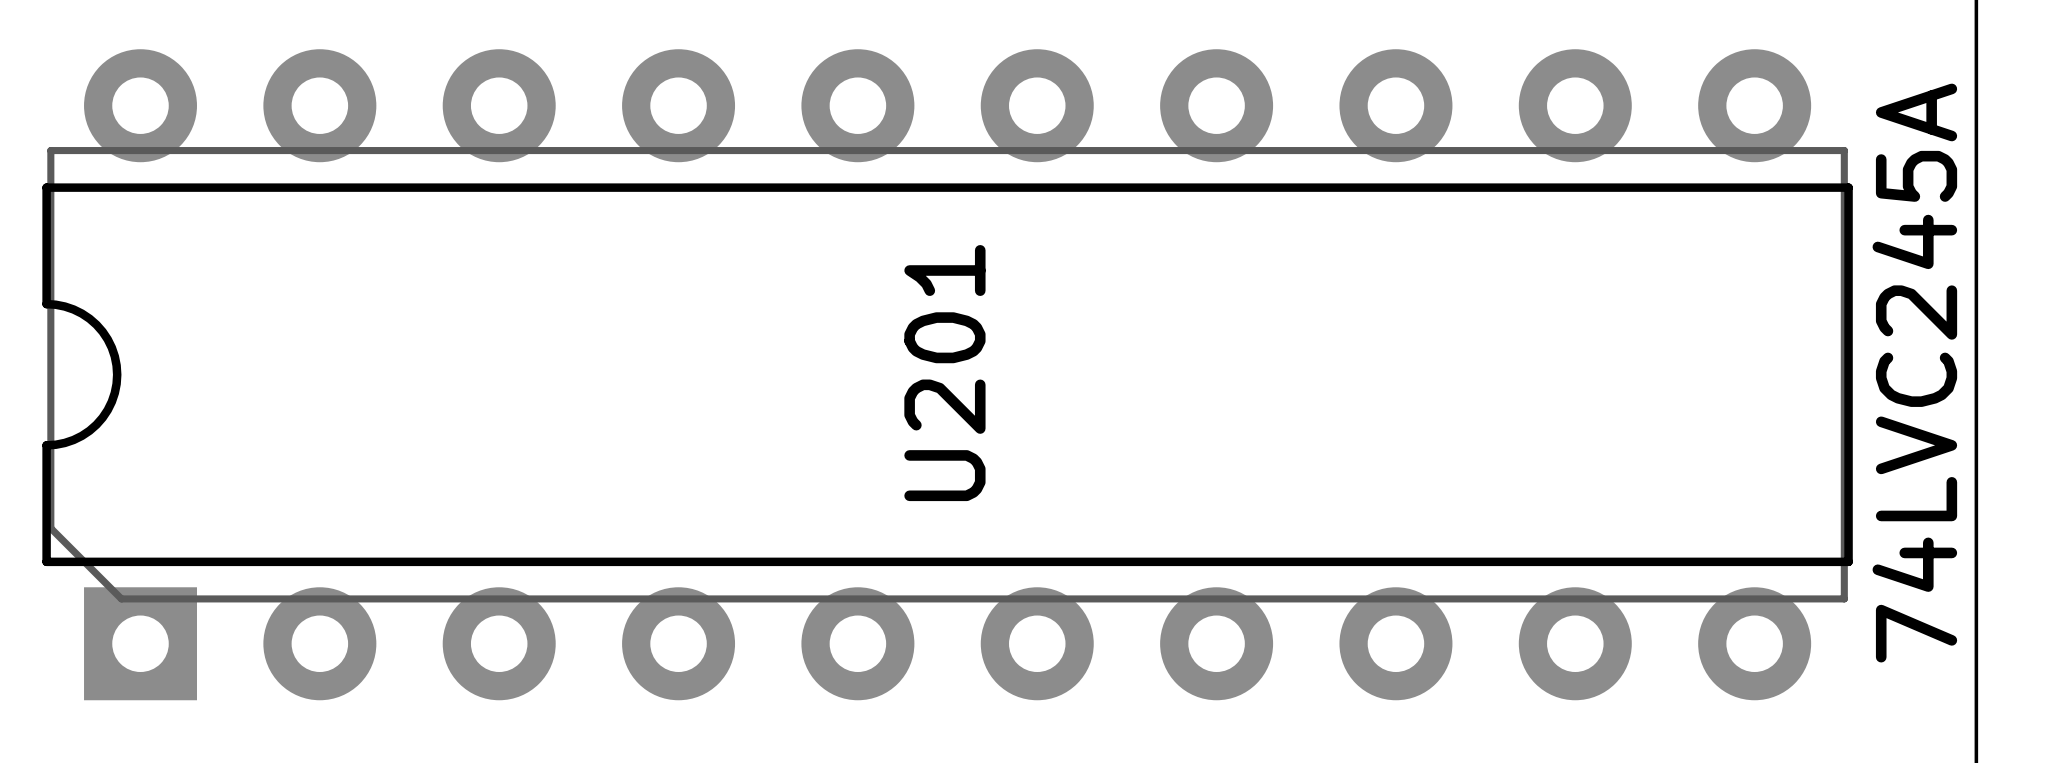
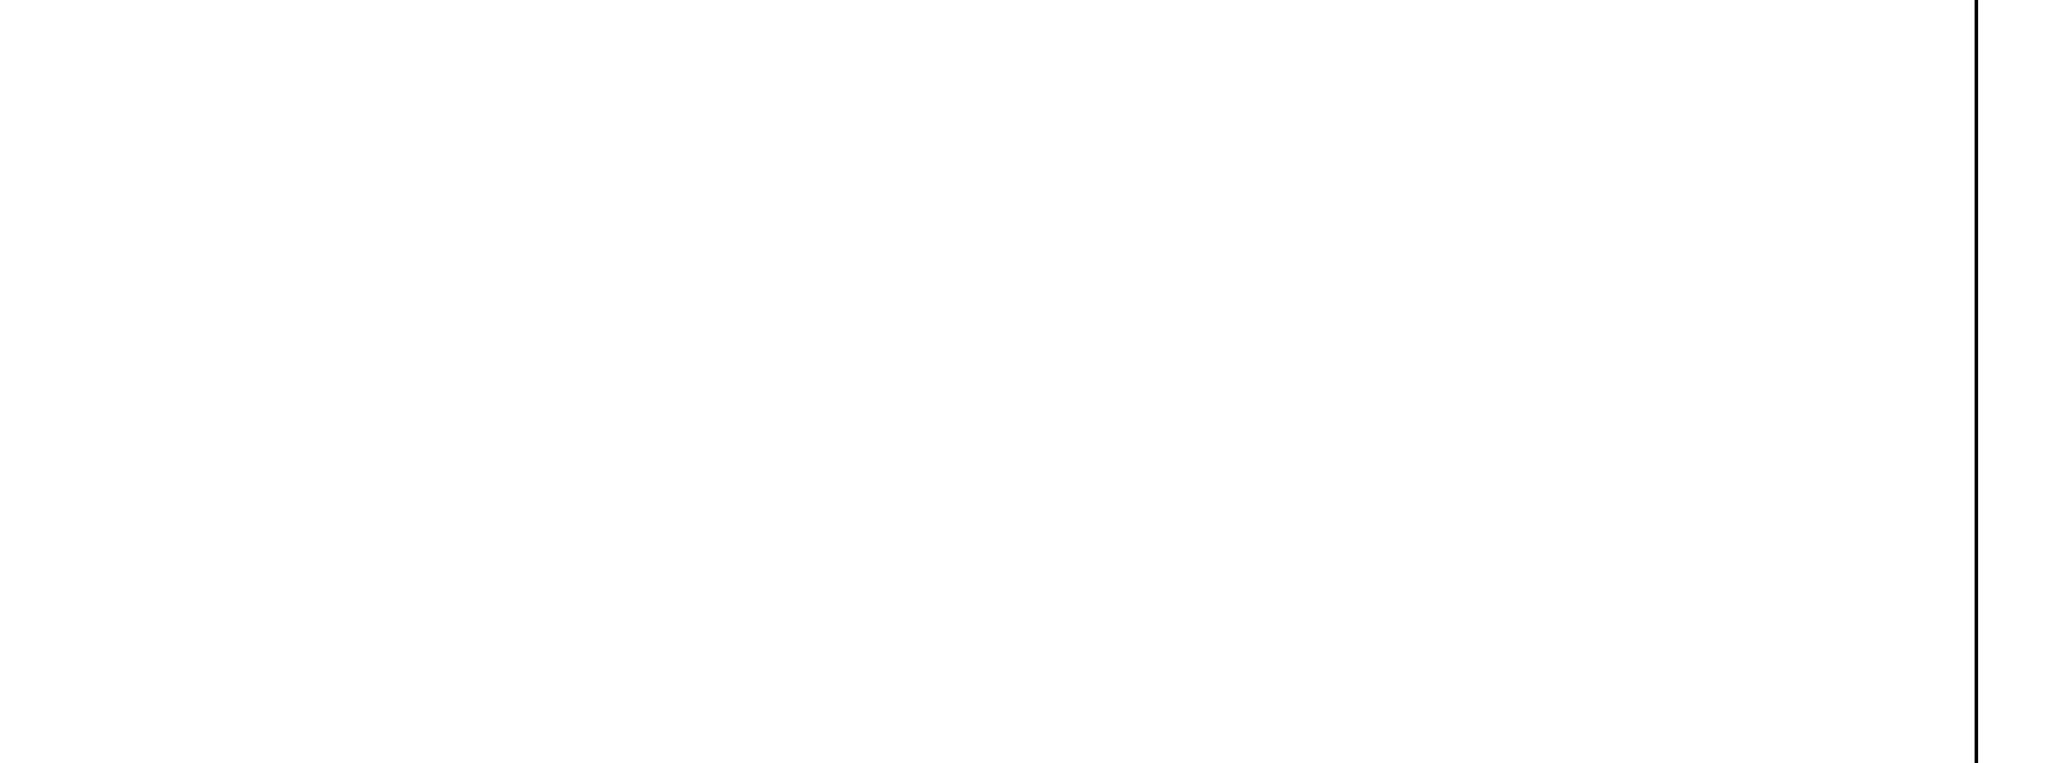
U201: 74LVC245A (947, 374) -> none

